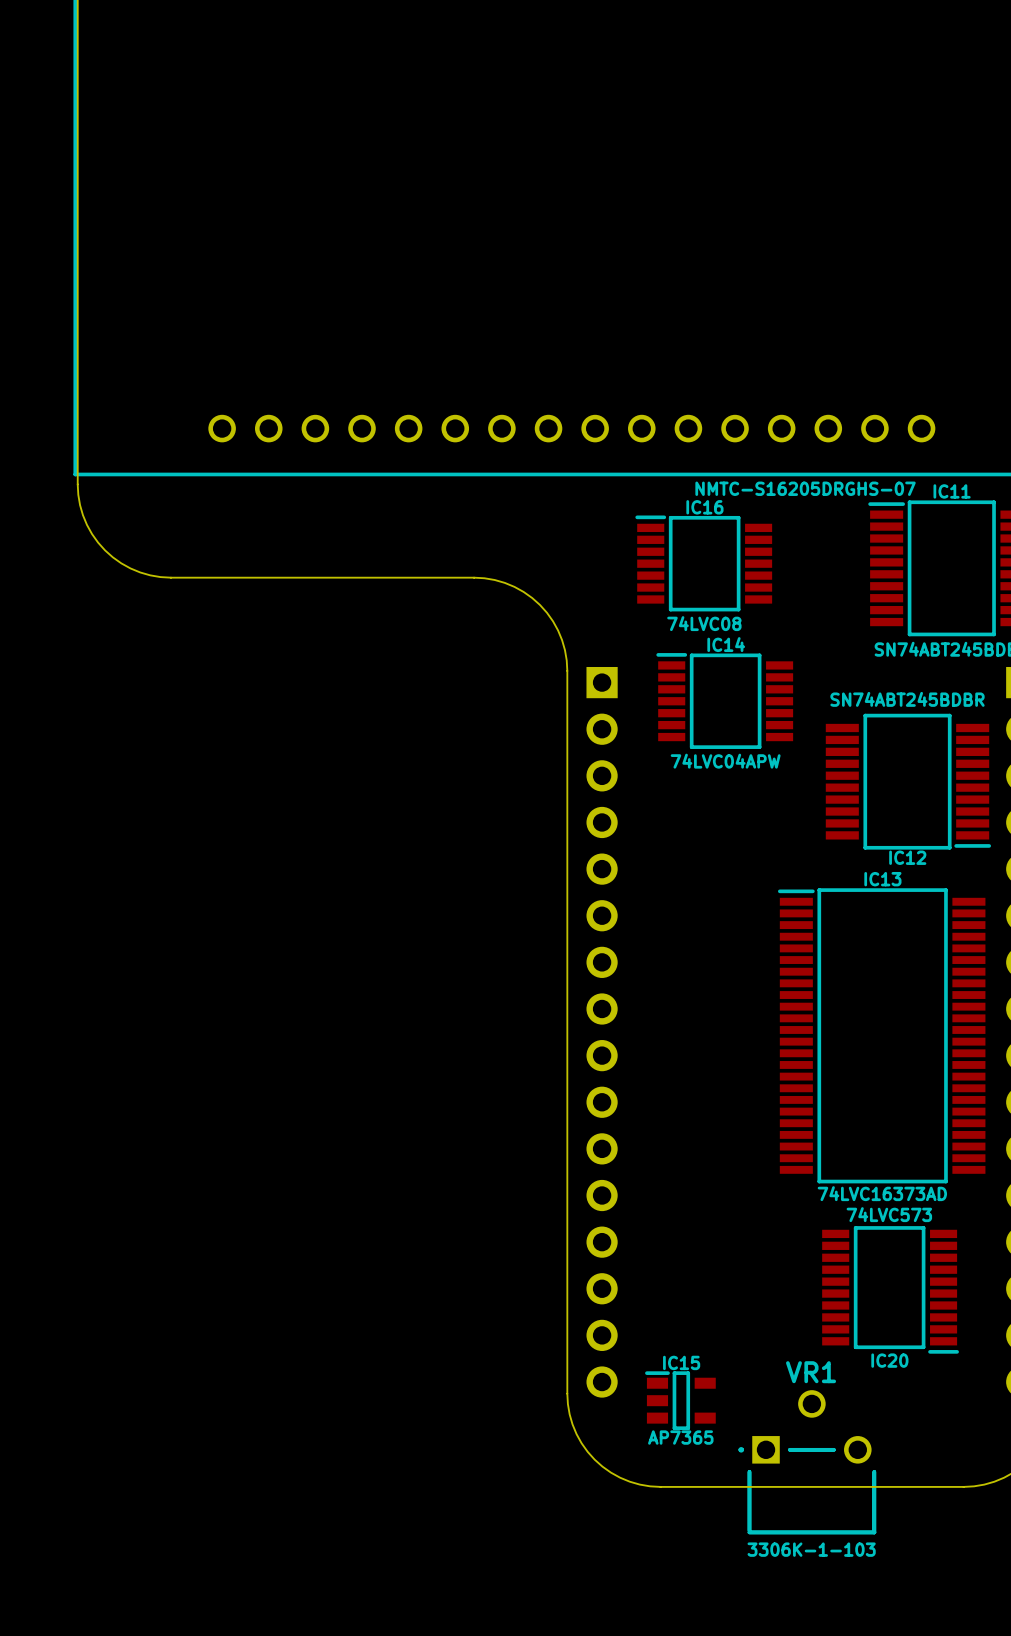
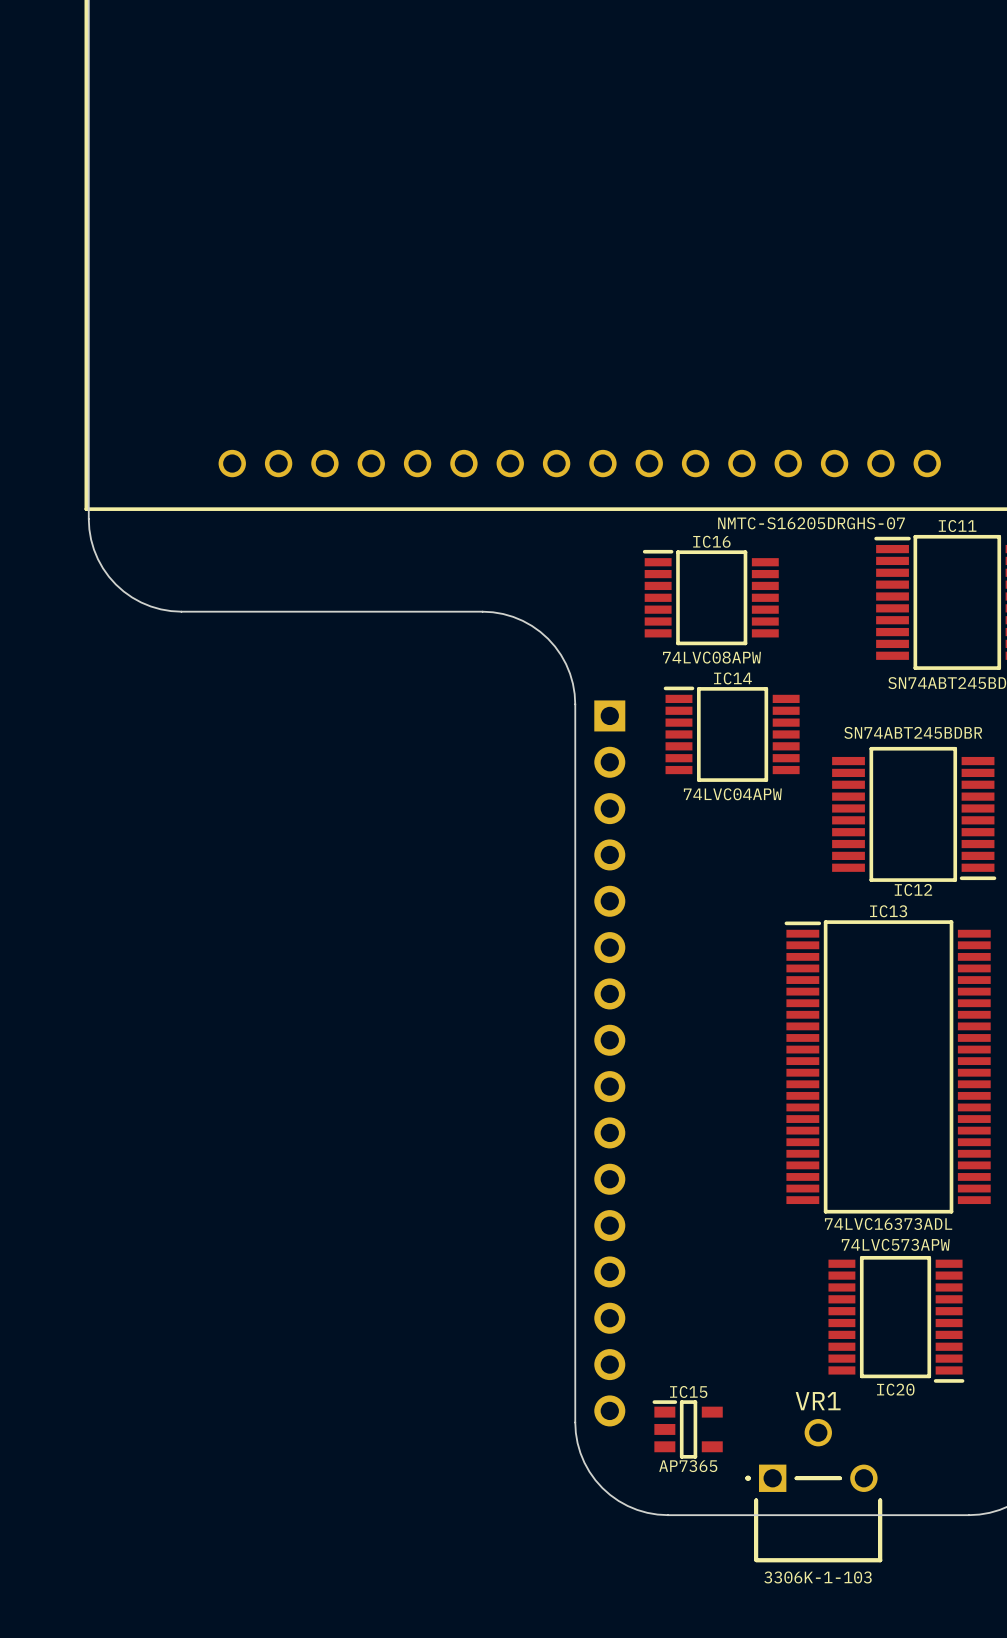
IC16 text: 74LVC08 (704, 623) -> 74LVC08APW (711, 657)
IC13 text: 74LVC16373AD (882, 1193) -> 74LVC16373ADL (888, 1224)
IC20 text: 74LVC573 (889, 1214) -> 74LVC573APW (895, 1244)

